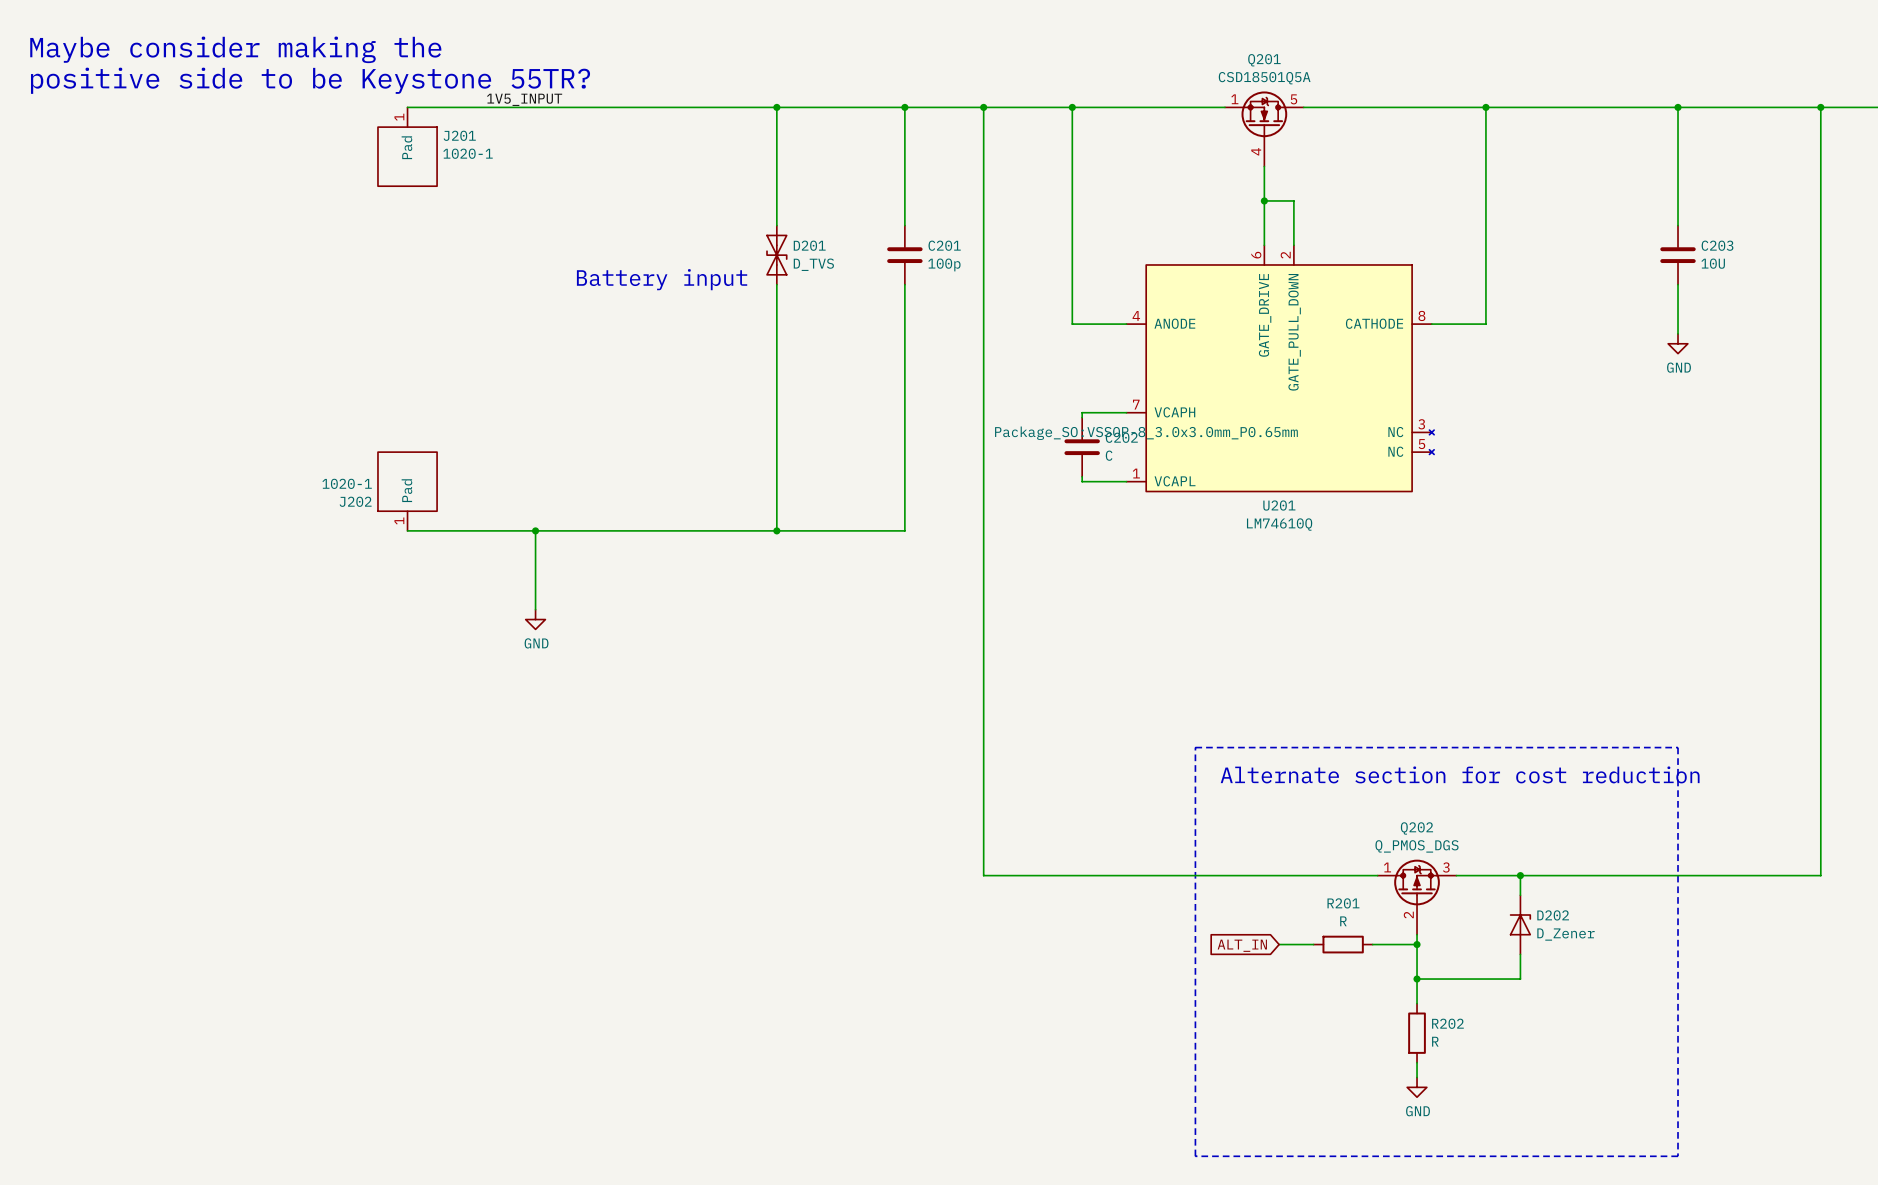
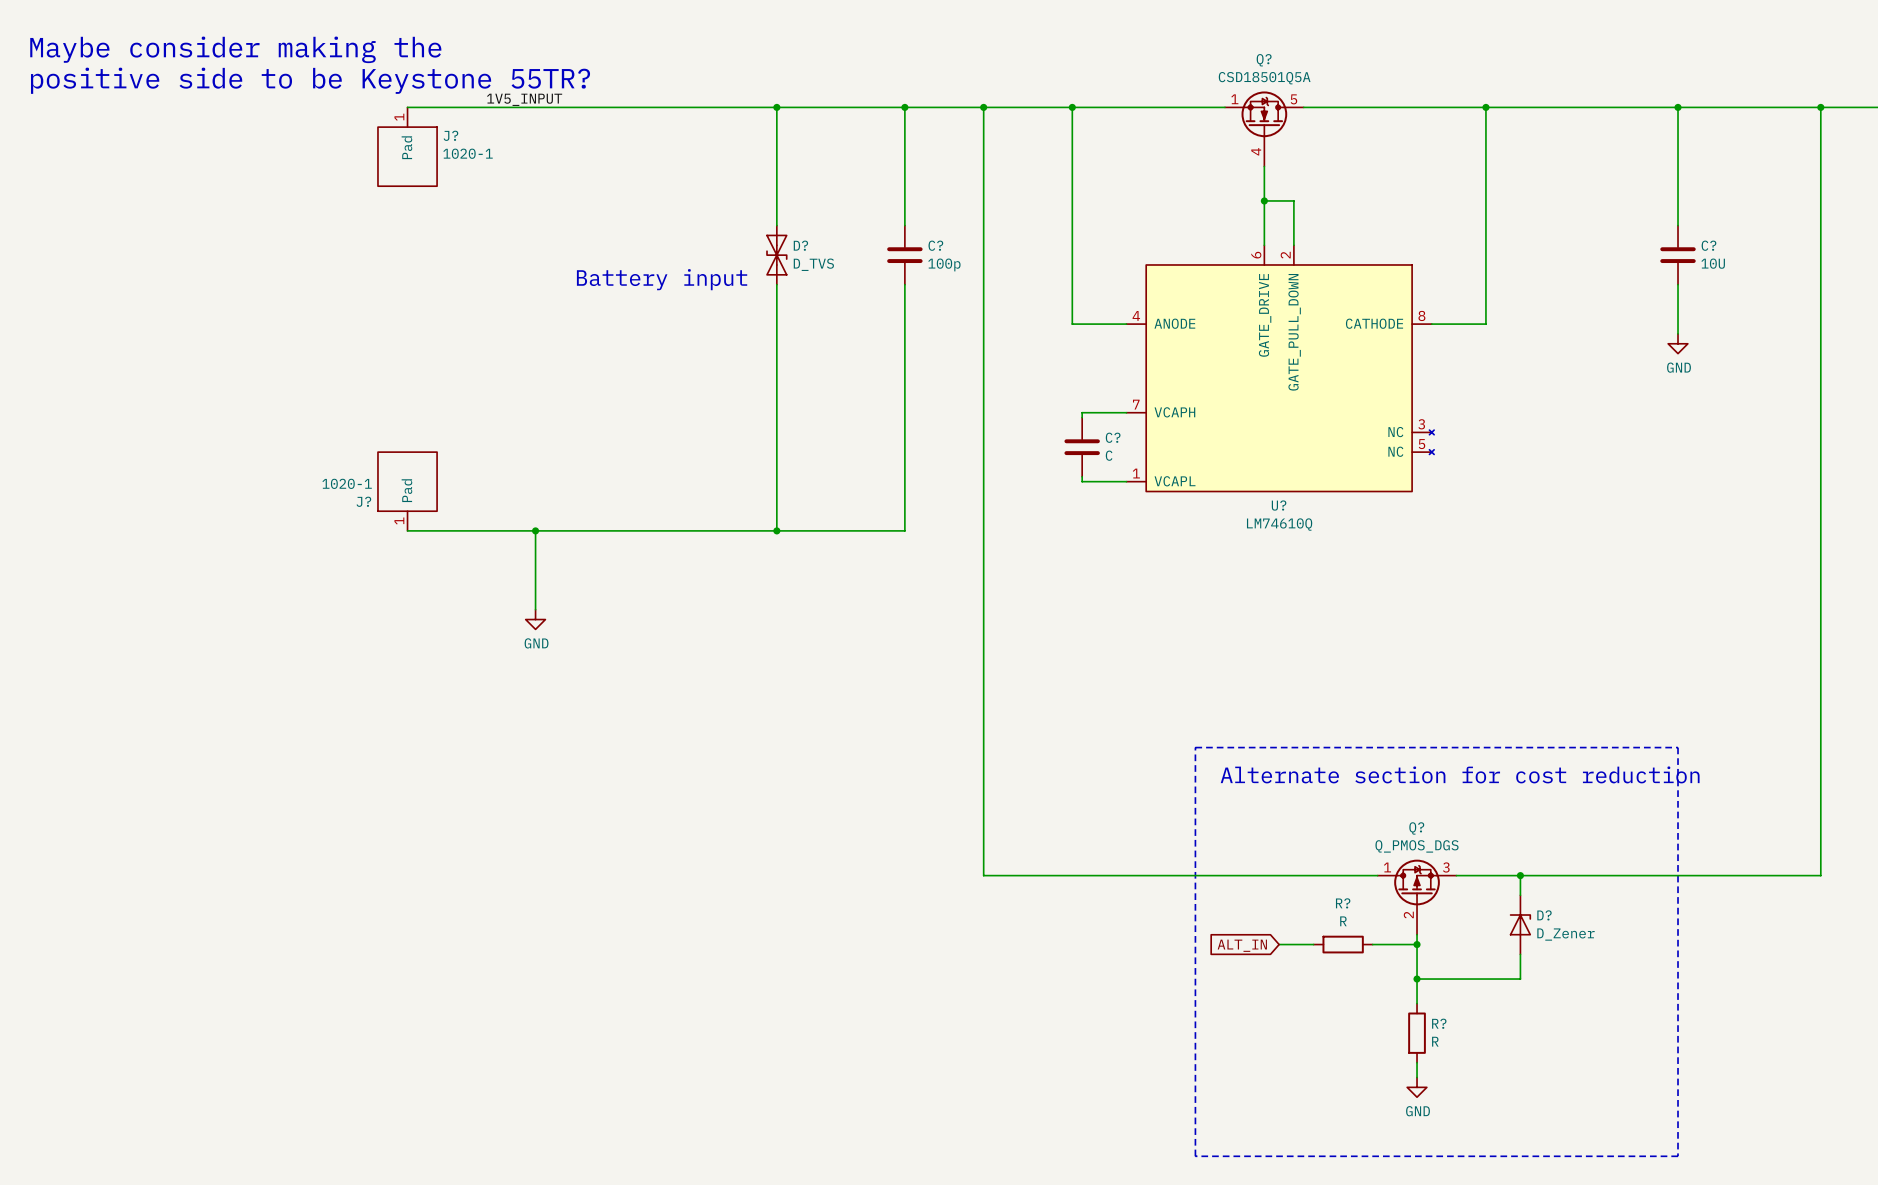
Q201 name: Q201 (1264, 60) -> Q? (1264, 60)
J201 name: J201 (459, 135) -> J? (450, 135)
D201 name: D201 (809, 245) -> D? (800, 245)
C201 name: C201 (944, 245) -> C? (935, 245)
C203 name: C203 (1717, 245) -> C? (1708, 245)
U201 text: Package_SO:VSSOP-8_3.0x3.0mm_P0.65mm (1146, 433) -> none
C202 name: C202 (1121, 437) -> C? (1113, 437)
J202 name: J202 (355, 501) -> J? (363, 501)
U201 name: U201 (1279, 505) -> U? (1279, 505)
Q202 name: Q202 (1416, 828) -> Q? (1416, 828)
R201 name: R201 (1343, 903) -> R? (1343, 903)
D202 name: D202 (1553, 915) -> D? (1544, 915)
R202 name: R202 (1447, 1023) -> R? (1439, 1023)

